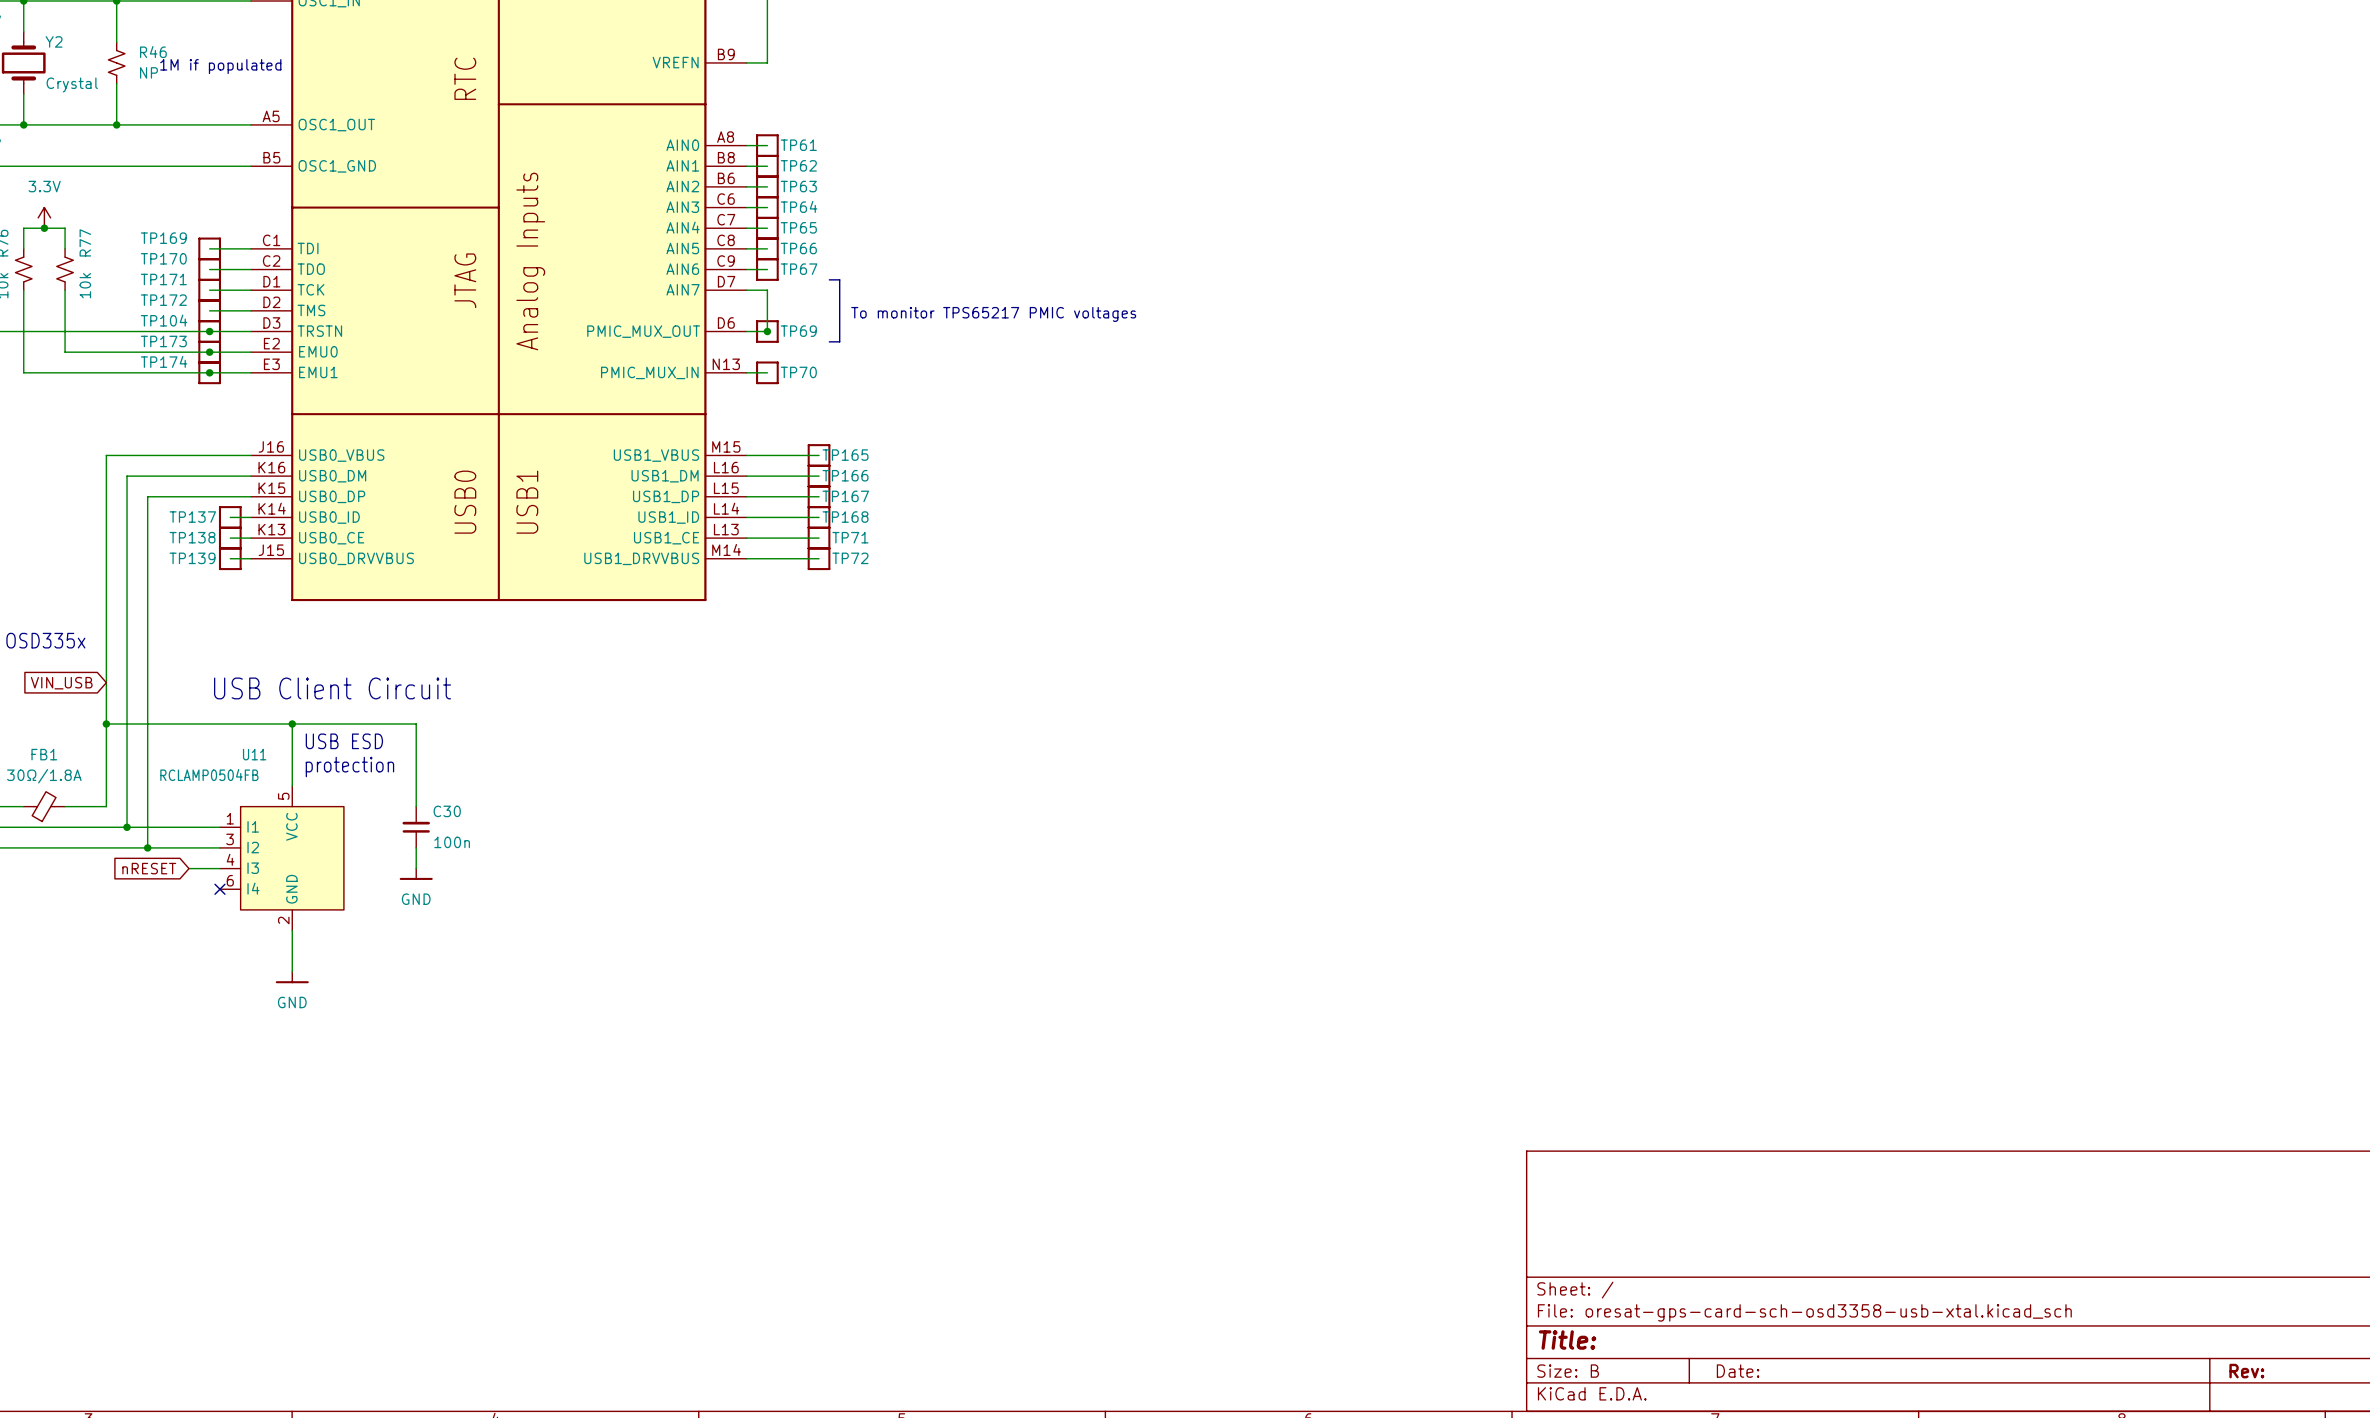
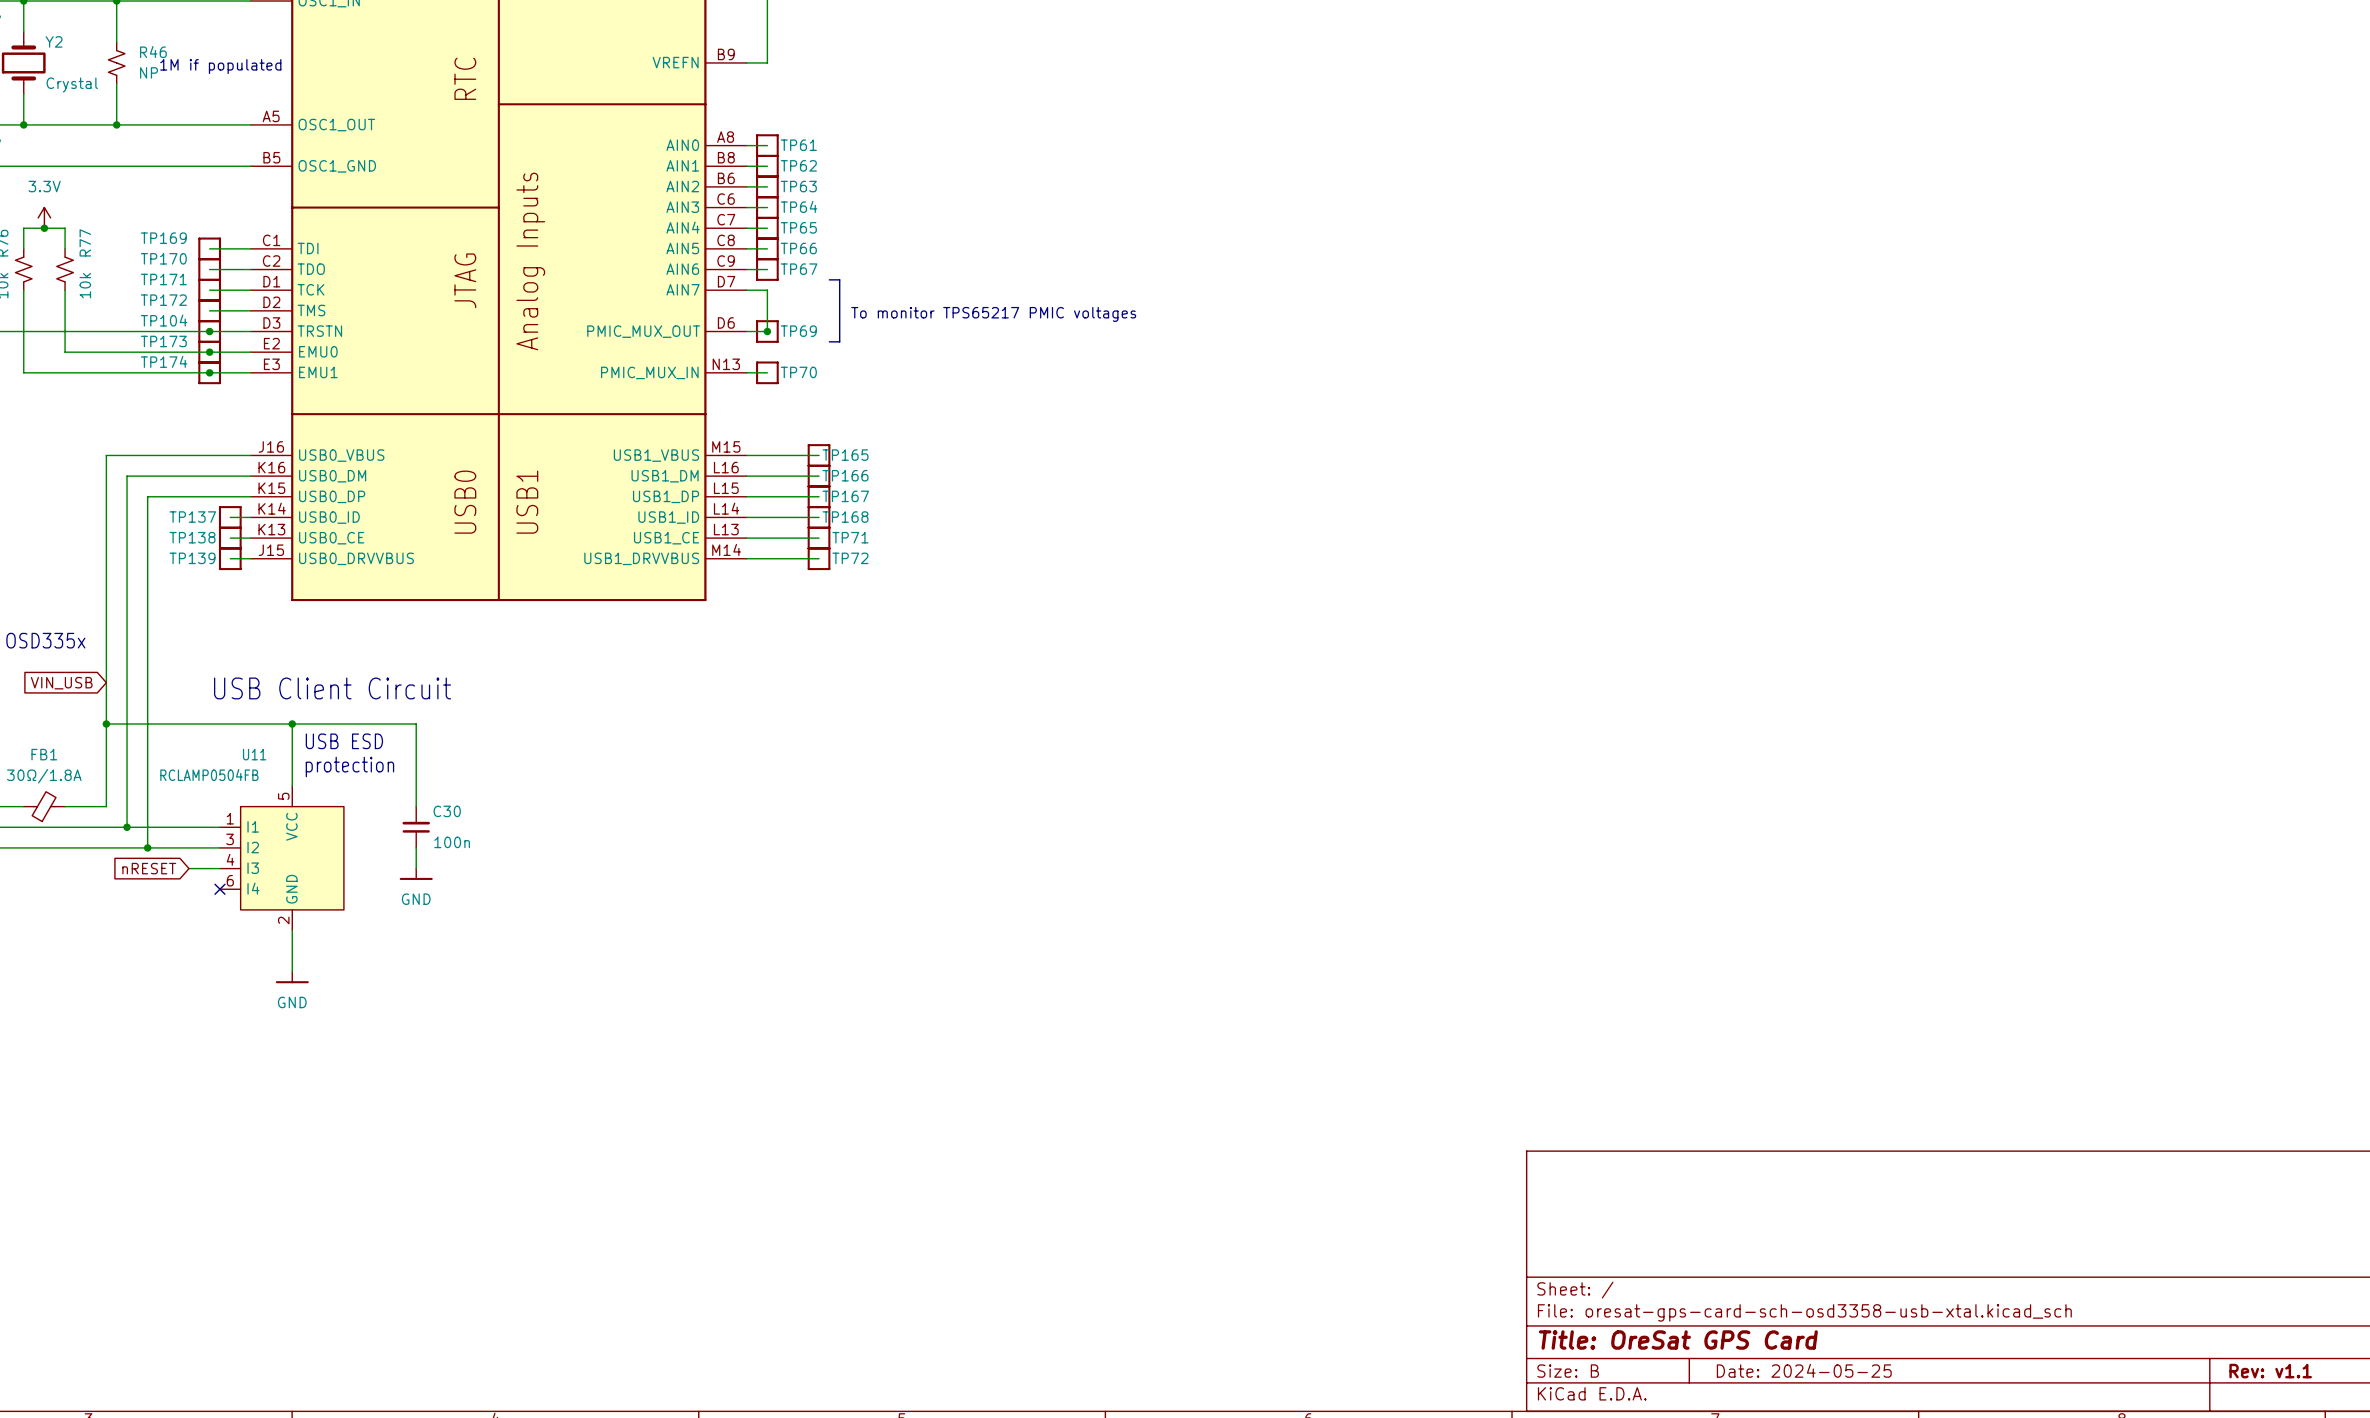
title block: Title: (1567, 1340) -> Title: OreSat GPS Card (1678, 1340)
title block: Date: (1738, 1371) -> Date: 2024-05-25 (1804, 1370)
title block: Rev: (2246, 1371) -> Rev: v1.1 (2270, 1371)

